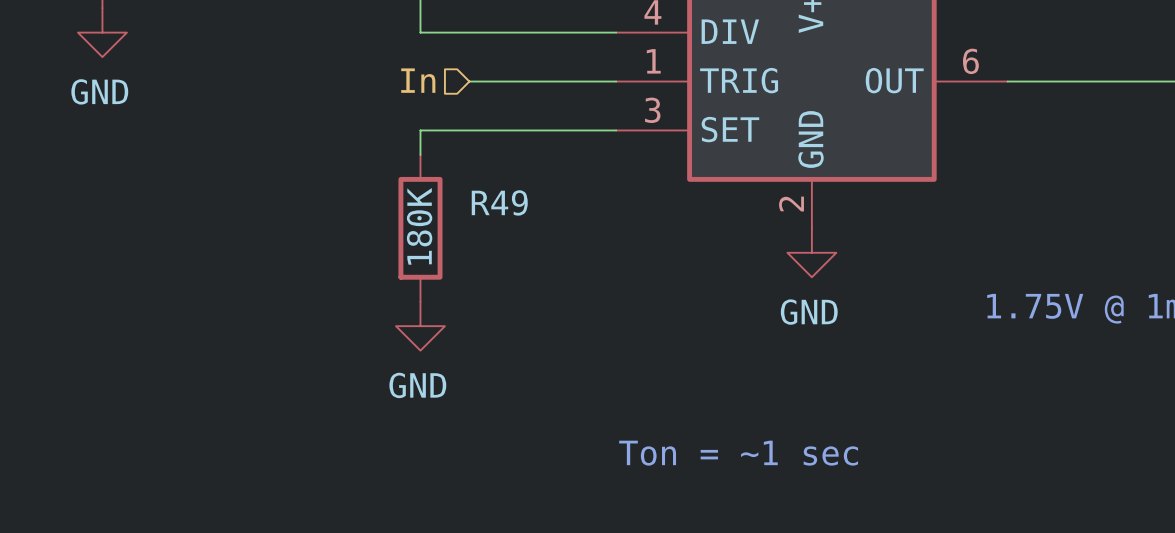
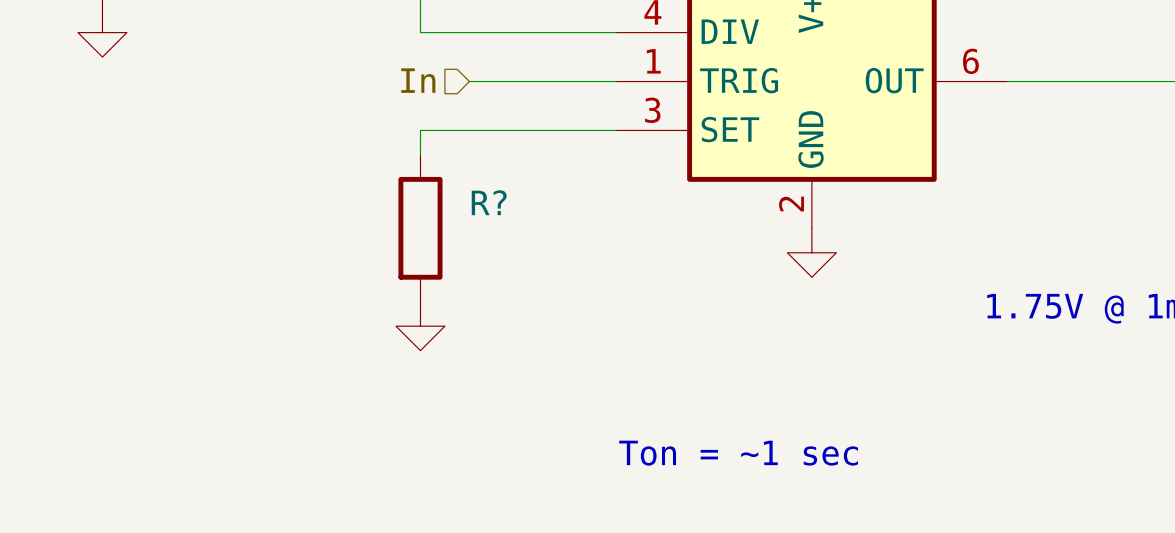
power symbol text: GND (99, 91) -> none
R49 name: R49 (499, 202) -> R? (489, 202)
R49 value: 180K (419, 226) -> none
power symbol text: GND (809, 312) -> none
power symbol text: GND (417, 385) -> none

